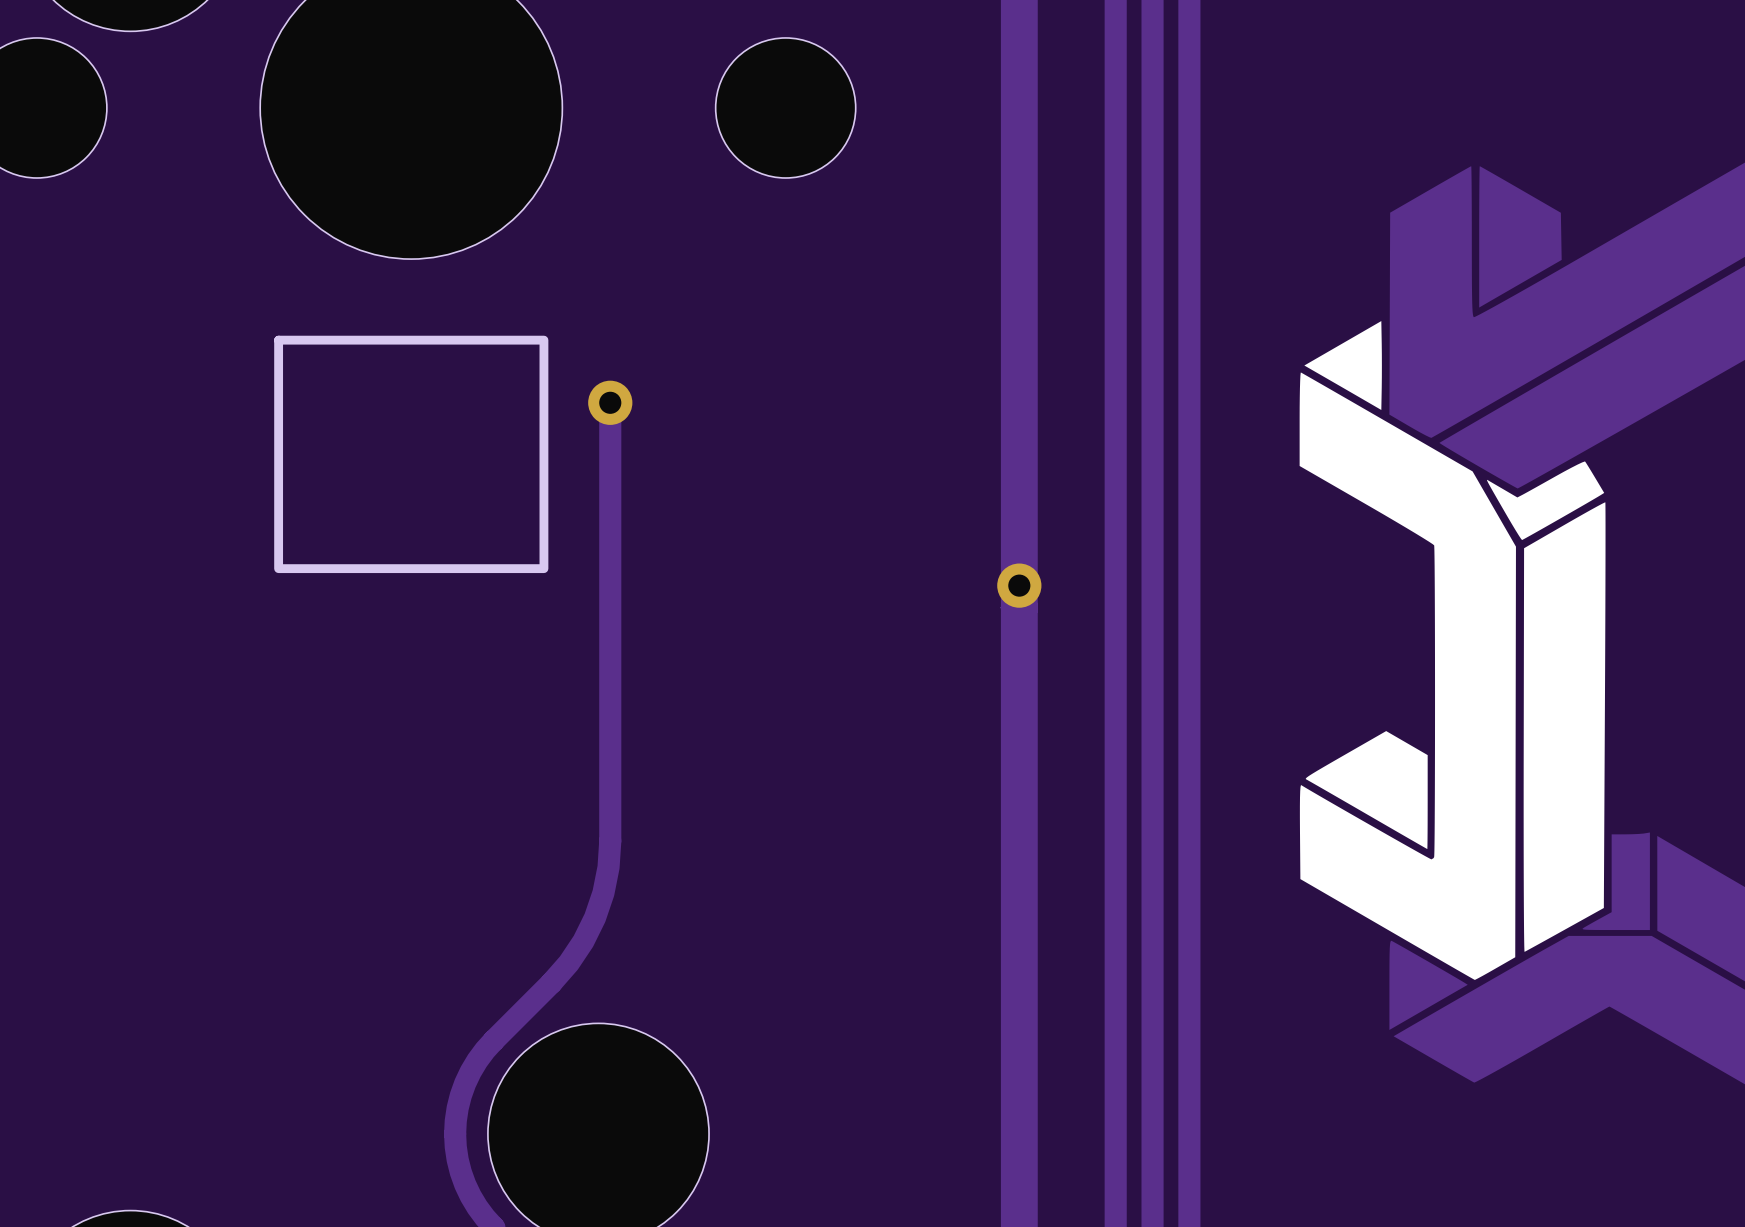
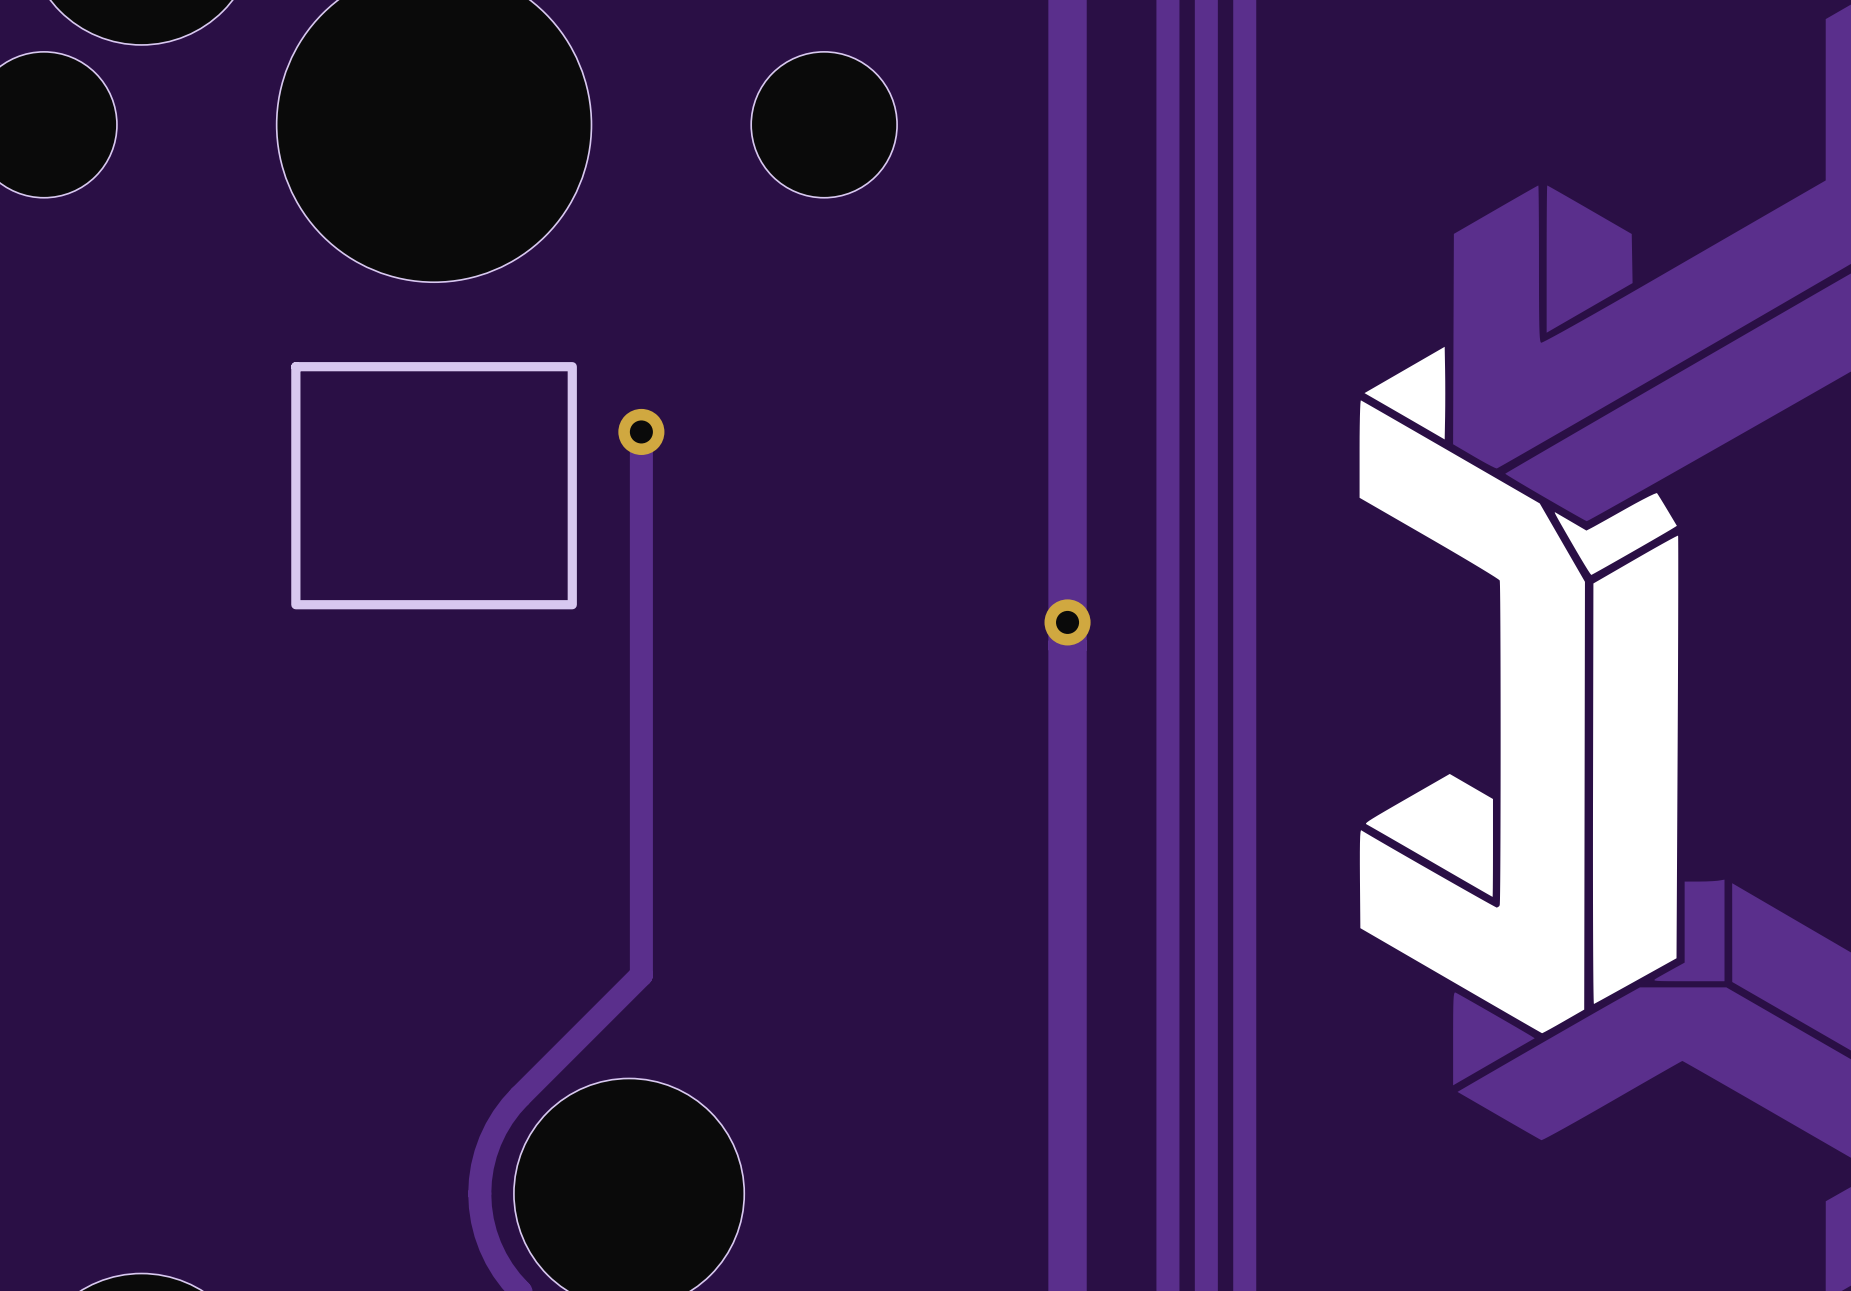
track: (610, 841) (608, 867) (603, 892) (595, 917) (583, 941) (568, 963) (551, 982) -> (641, 888) (641, 975) (580, 1036)

